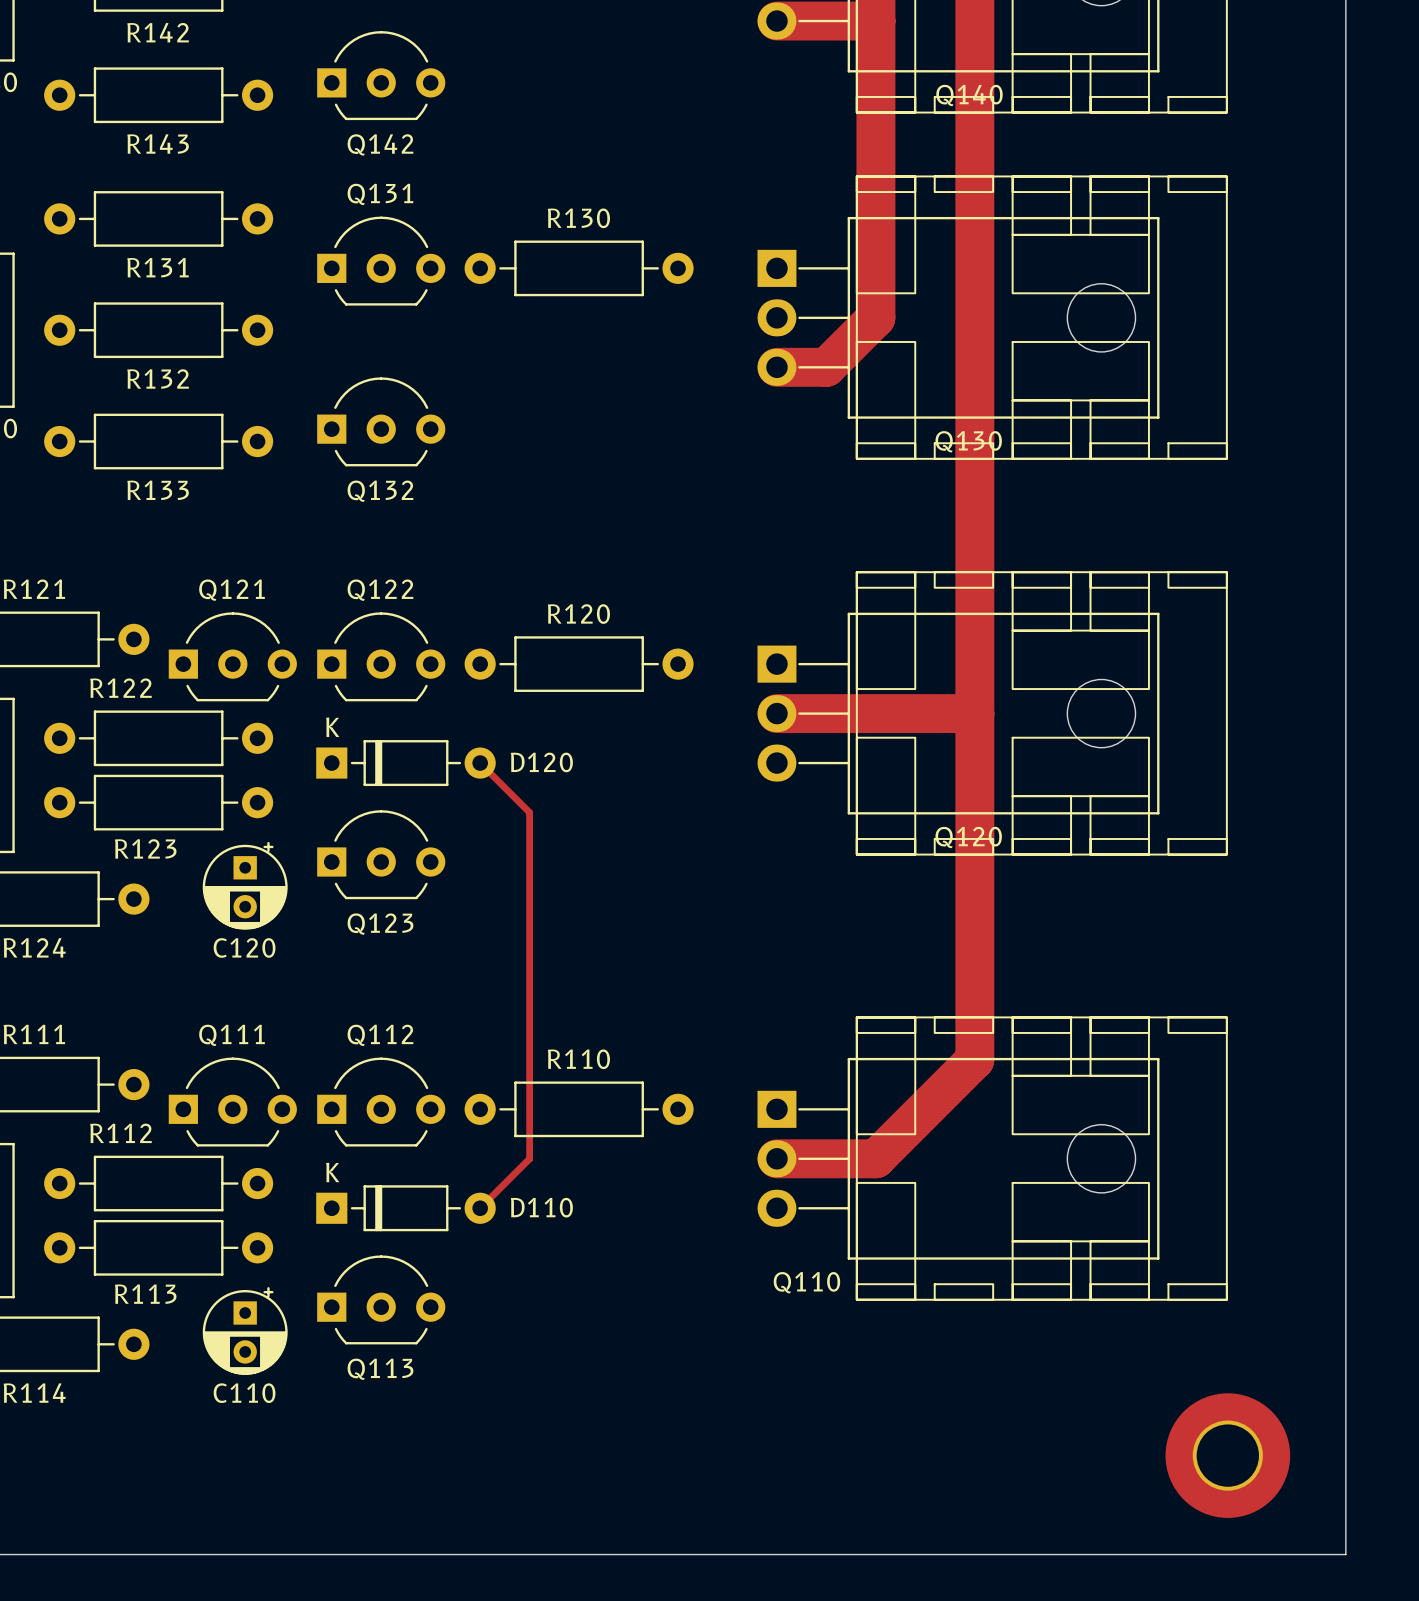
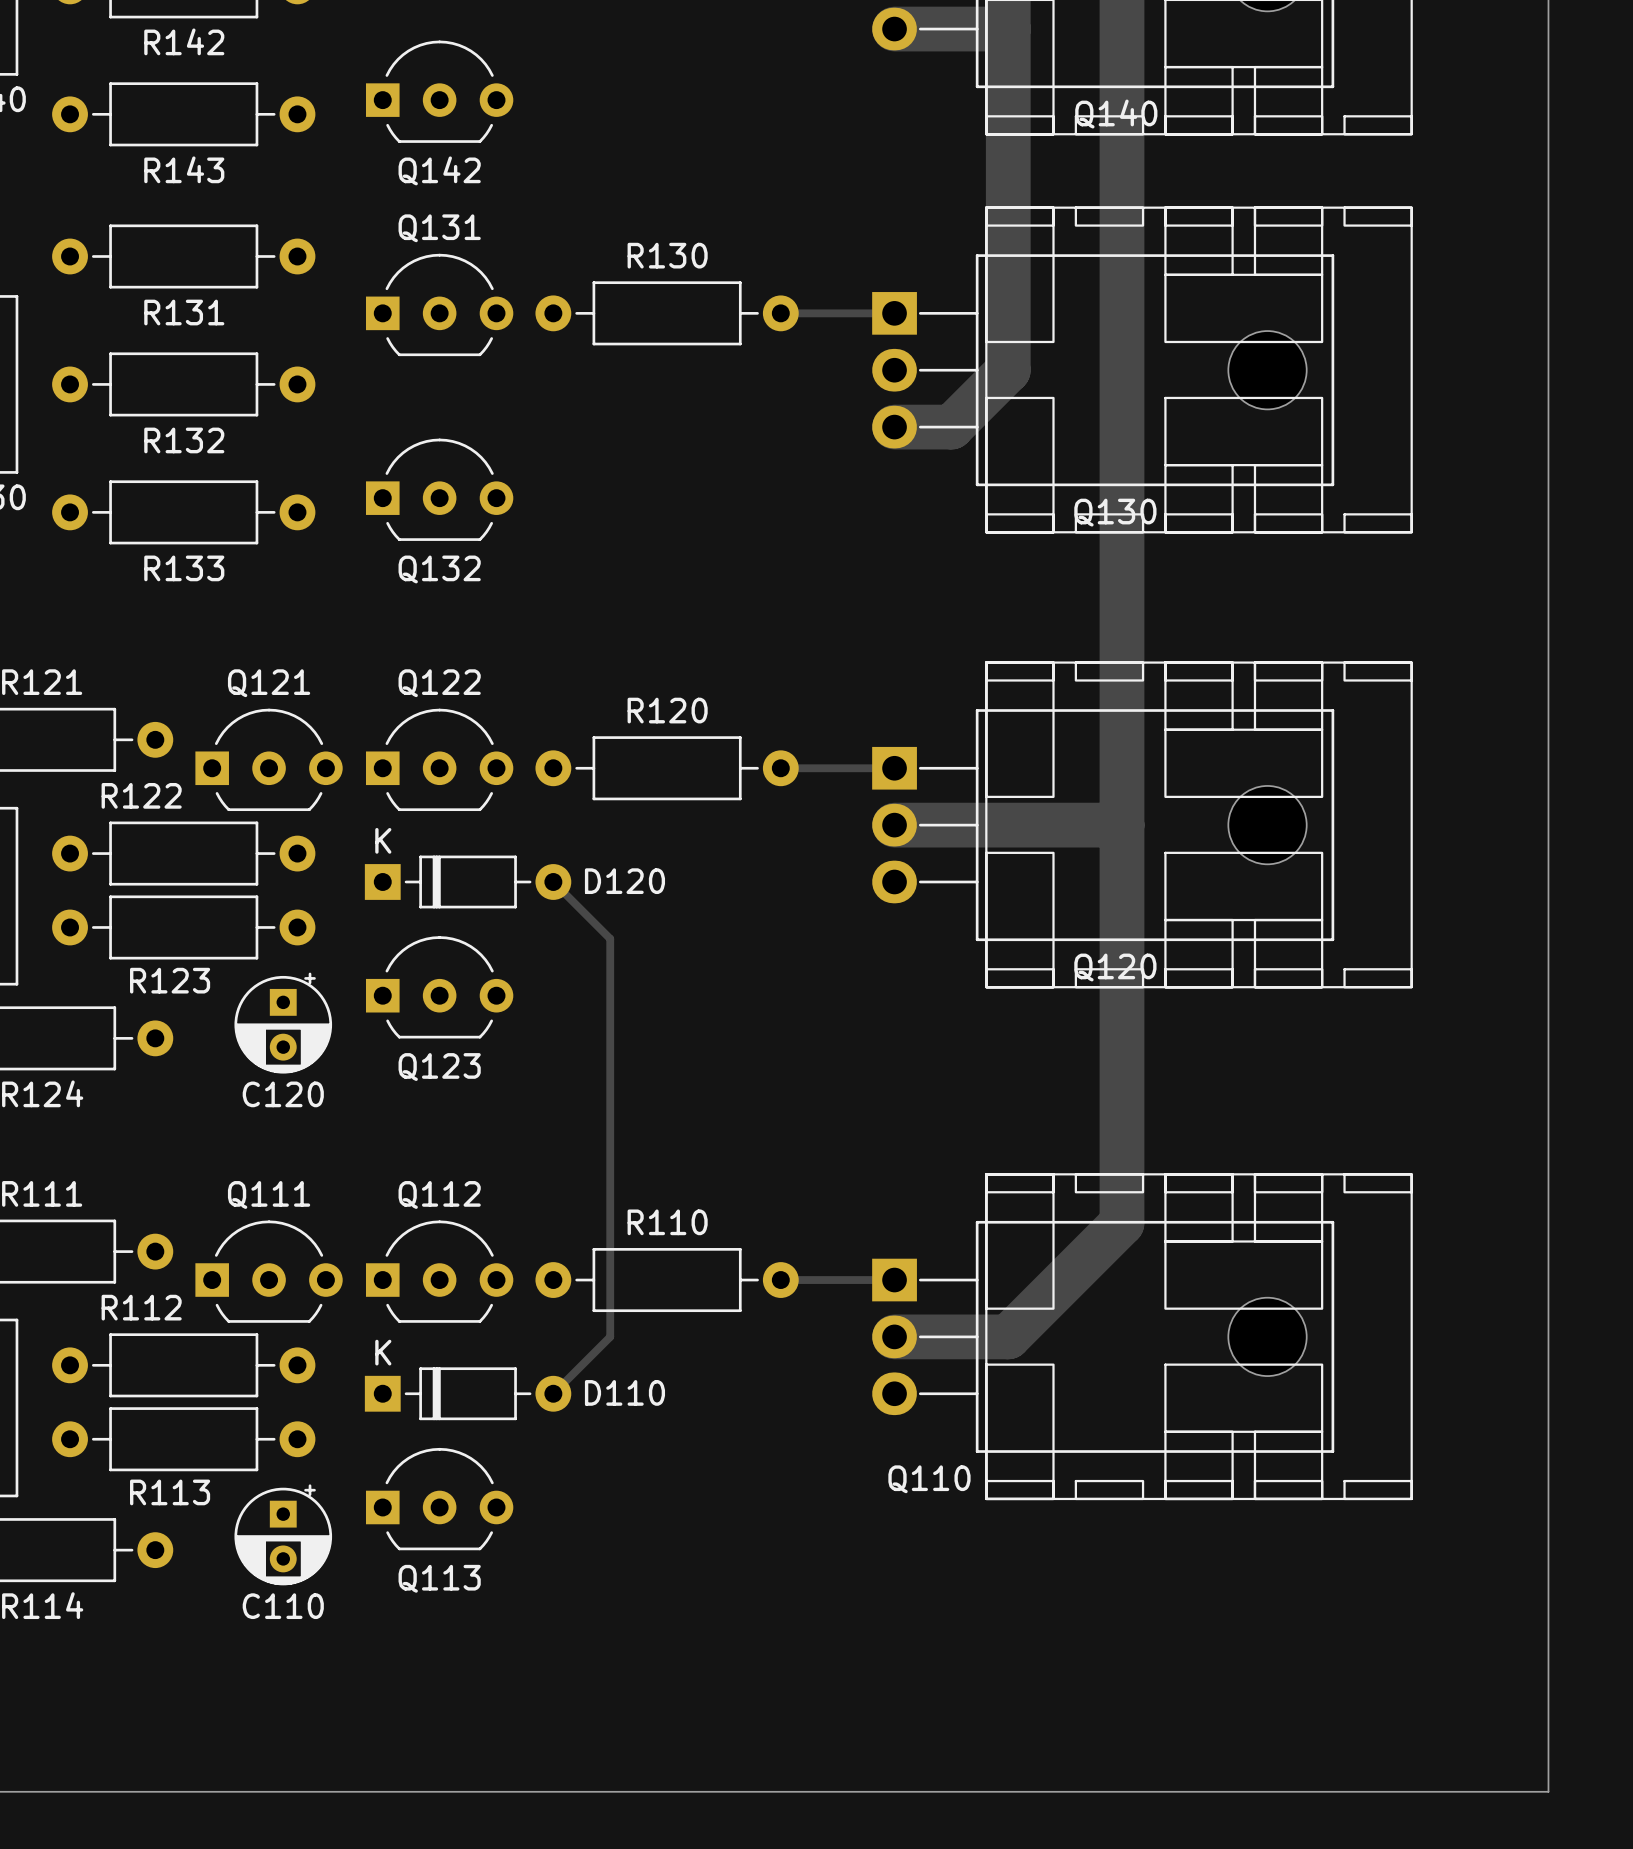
track: none -> (780, 313) (894, 313)
track: none -> (780, 768) (894, 768)
track: none -> (780, 1280) (894, 1280)
part: (1227, 1455) -> none

